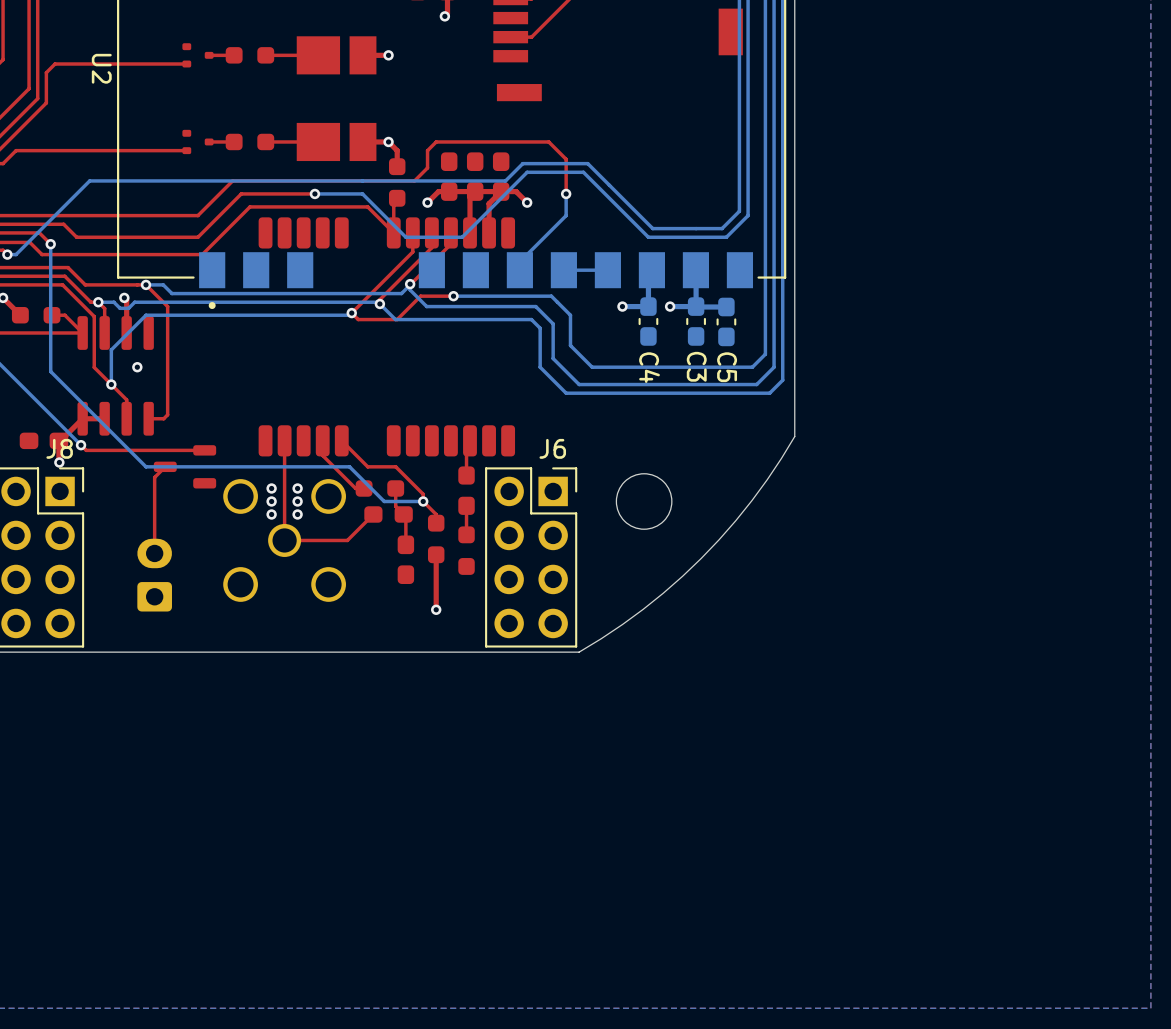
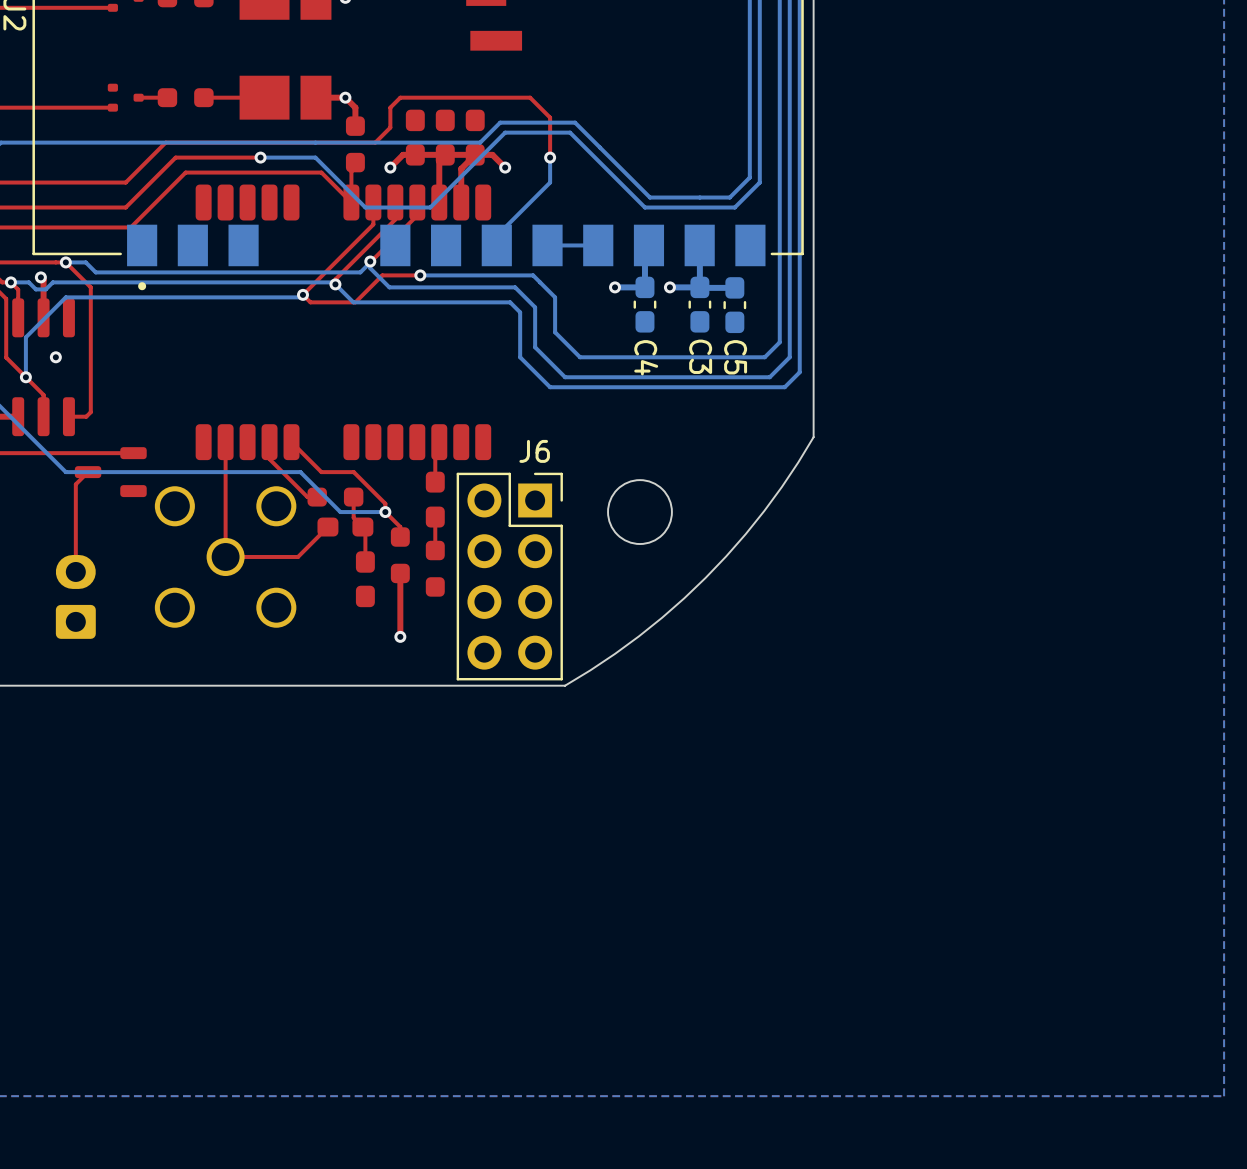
via: (271, 488) -> none
via: (297, 488) -> none
via: (271, 501) -> none
via: (297, 501) -> none
via: (271, 514) -> none
via: (297, 514) -> none

